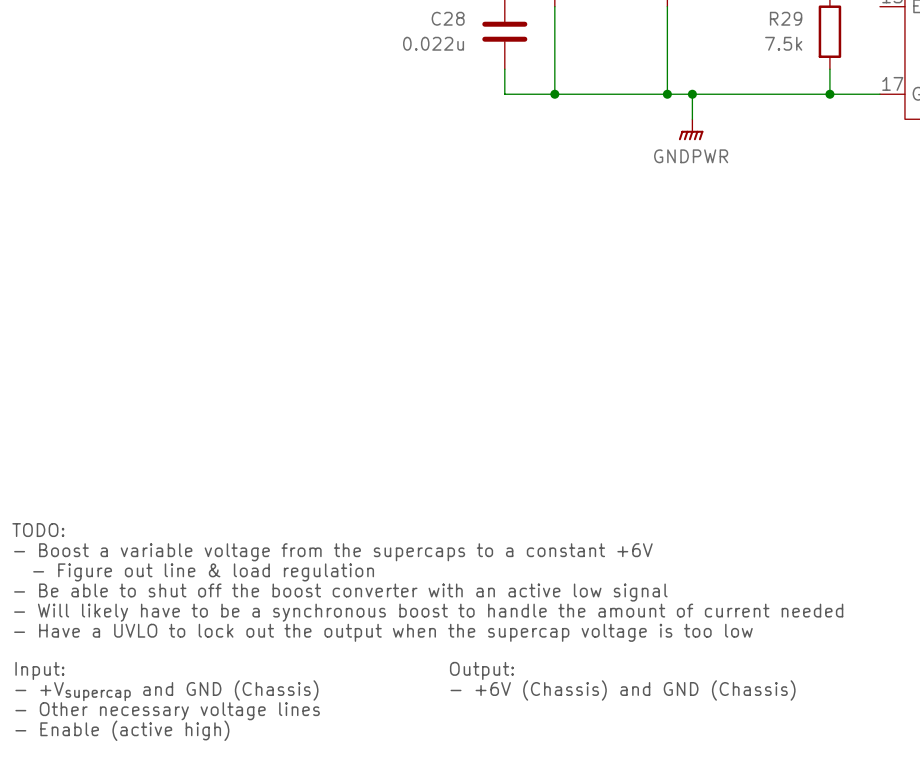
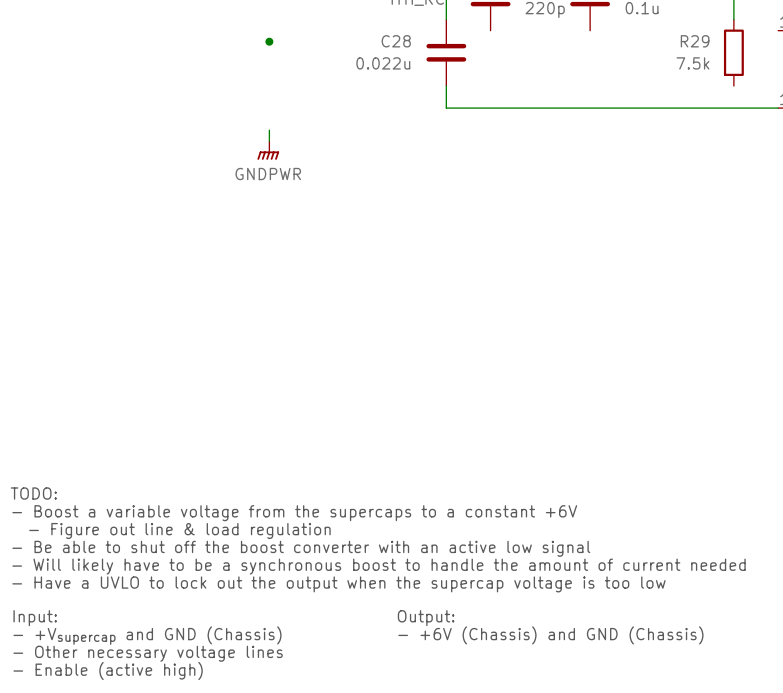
wire: (554, 6) (554, 94) -> none
wire: (667, 6) (667, 94) -> none
junction: none -> (269, 41)
wire: (829, 69) (829, 94) -> none
junction: (554, 94) -> none
junction: (667, 94) -> none
wire: (692, 94) (692, 119) -> none
junction: (692, 94) -> none
junction: (829, 94) -> none
wire: none -> (269, 130) (269, 141)
power symbol: GNDPWR (691, 129) -> none
power symbol: none -> GNDPWR (268, 150)

